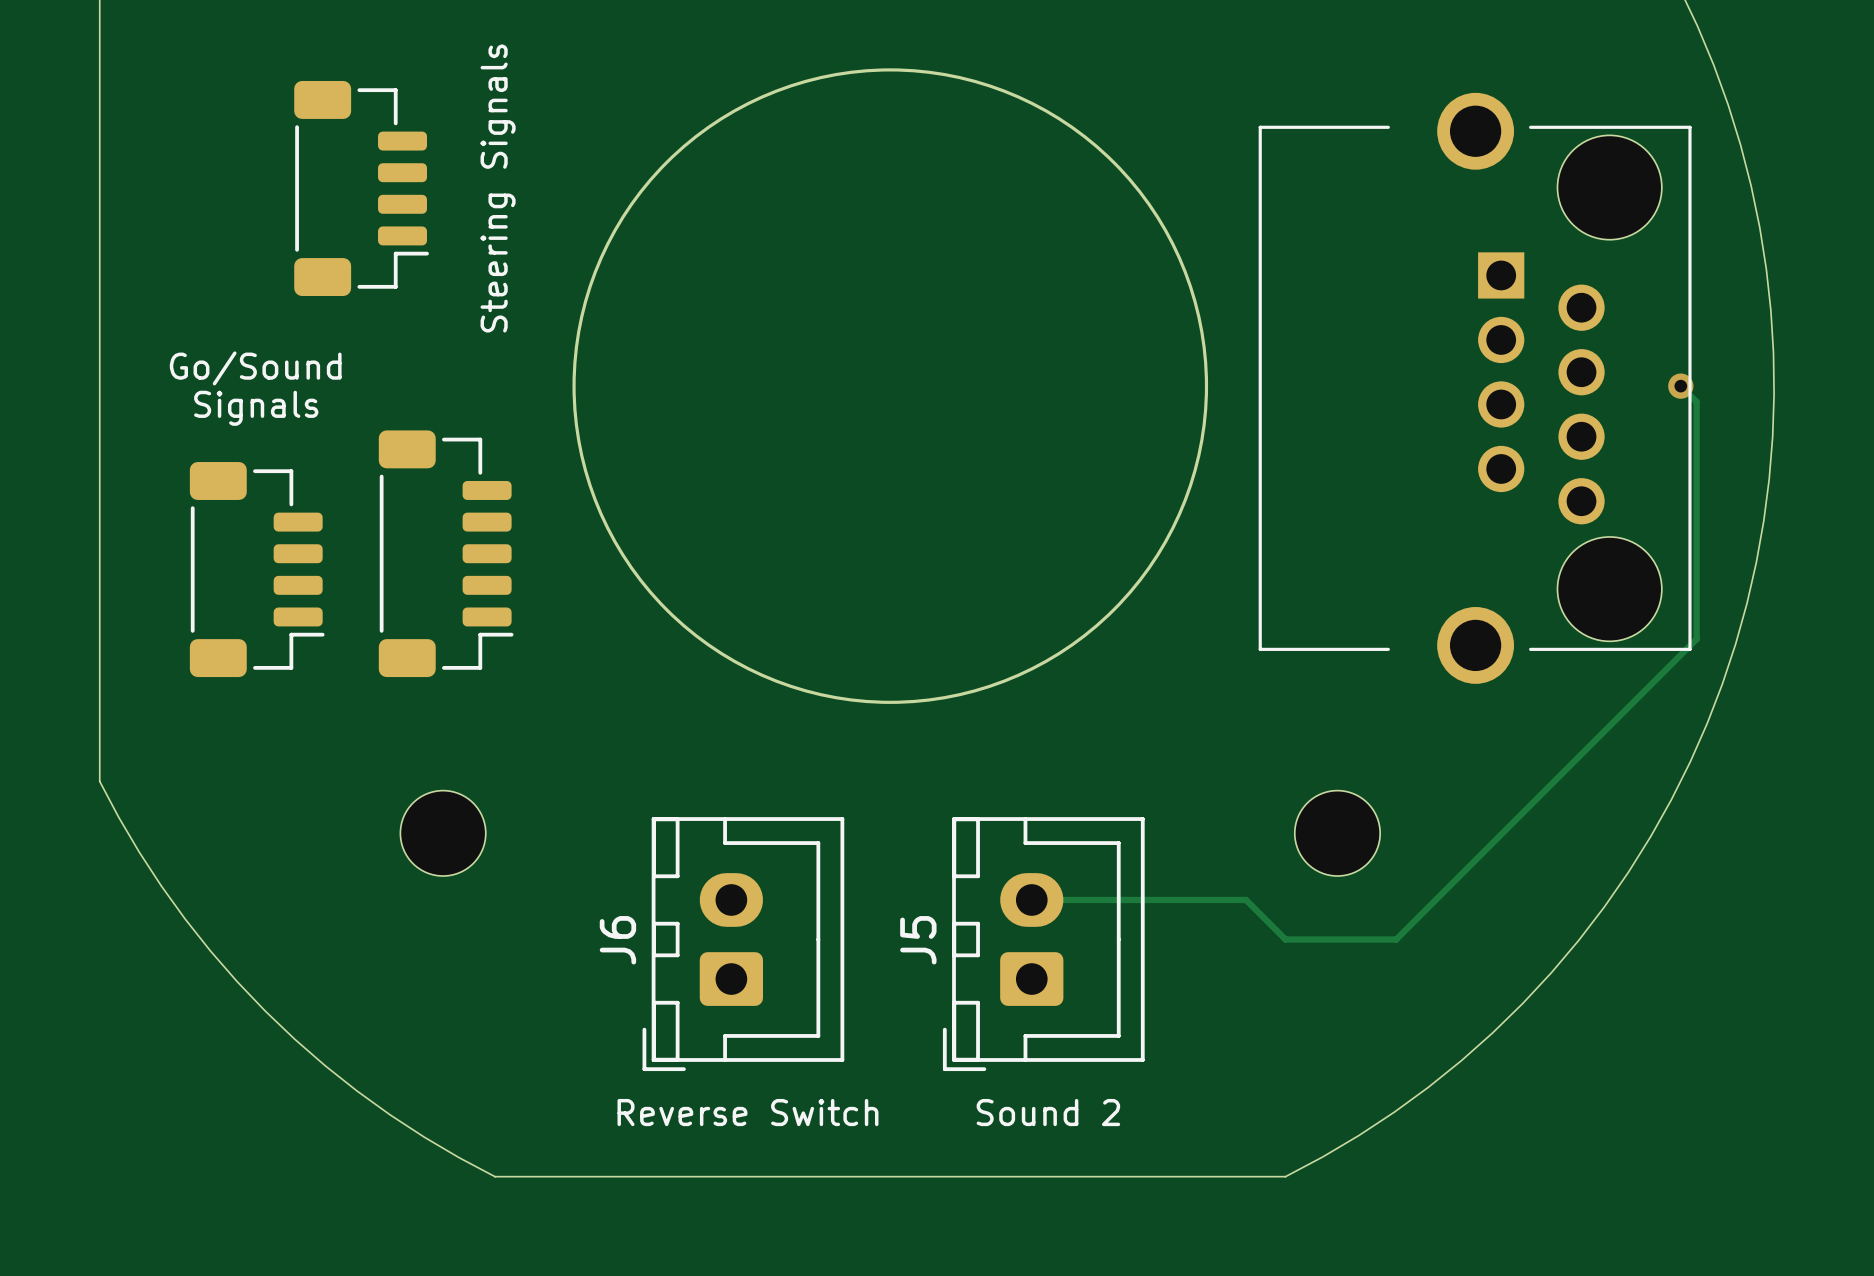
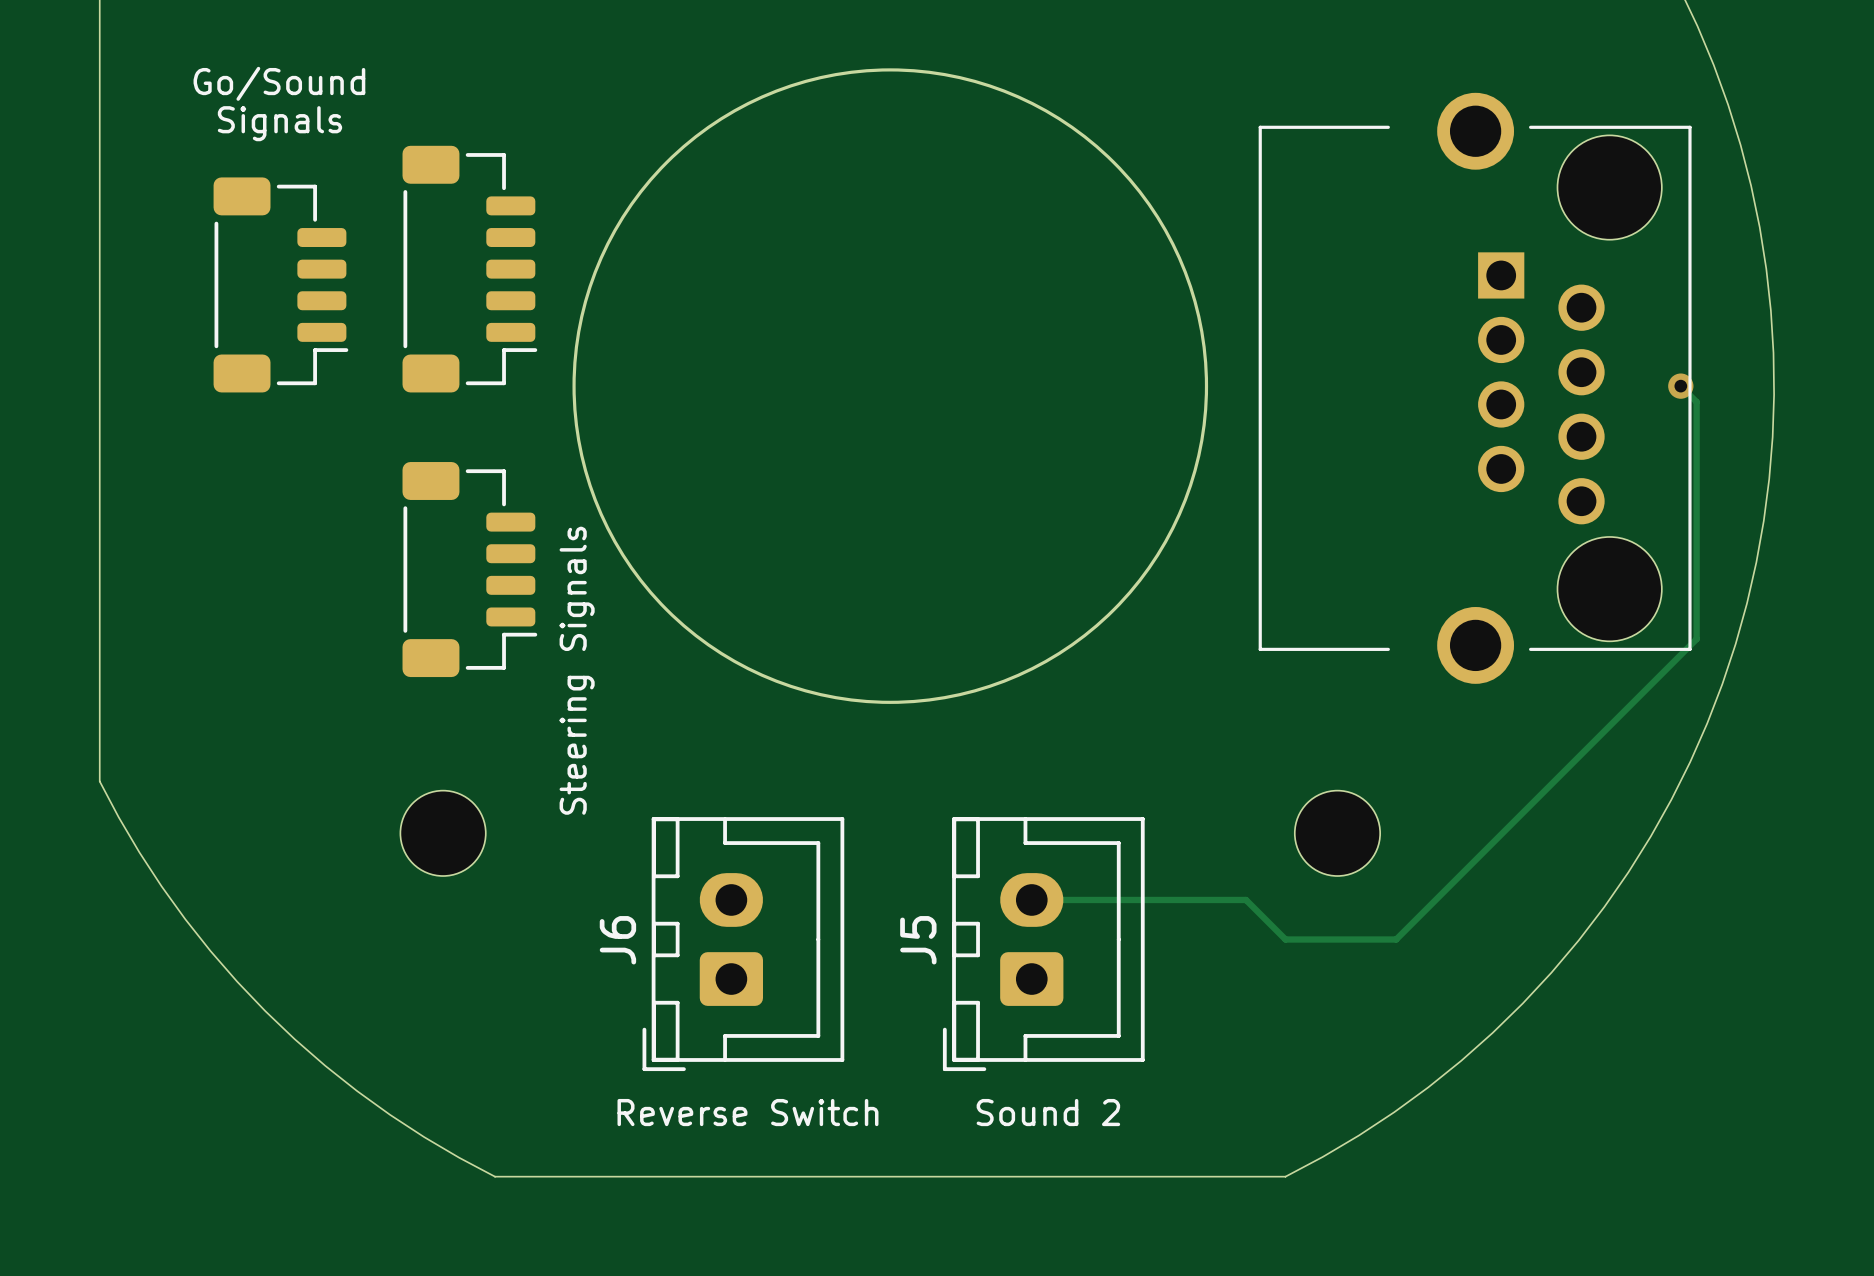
part position: (361, 188) -> (280, 284)
text position: Steering Signals (498, 188) -> Steering Signals (577, 670)
part: none -> (469, 269)
text position: Go/Sound (255, 368) -> Go/Sound (279, 83)
text position: Signals (256, 408) -> Signals (279, 123)
part footprint: [378, 430, 514, 678] -> [402, 462, 538, 678]
part: (257, 569) -> none

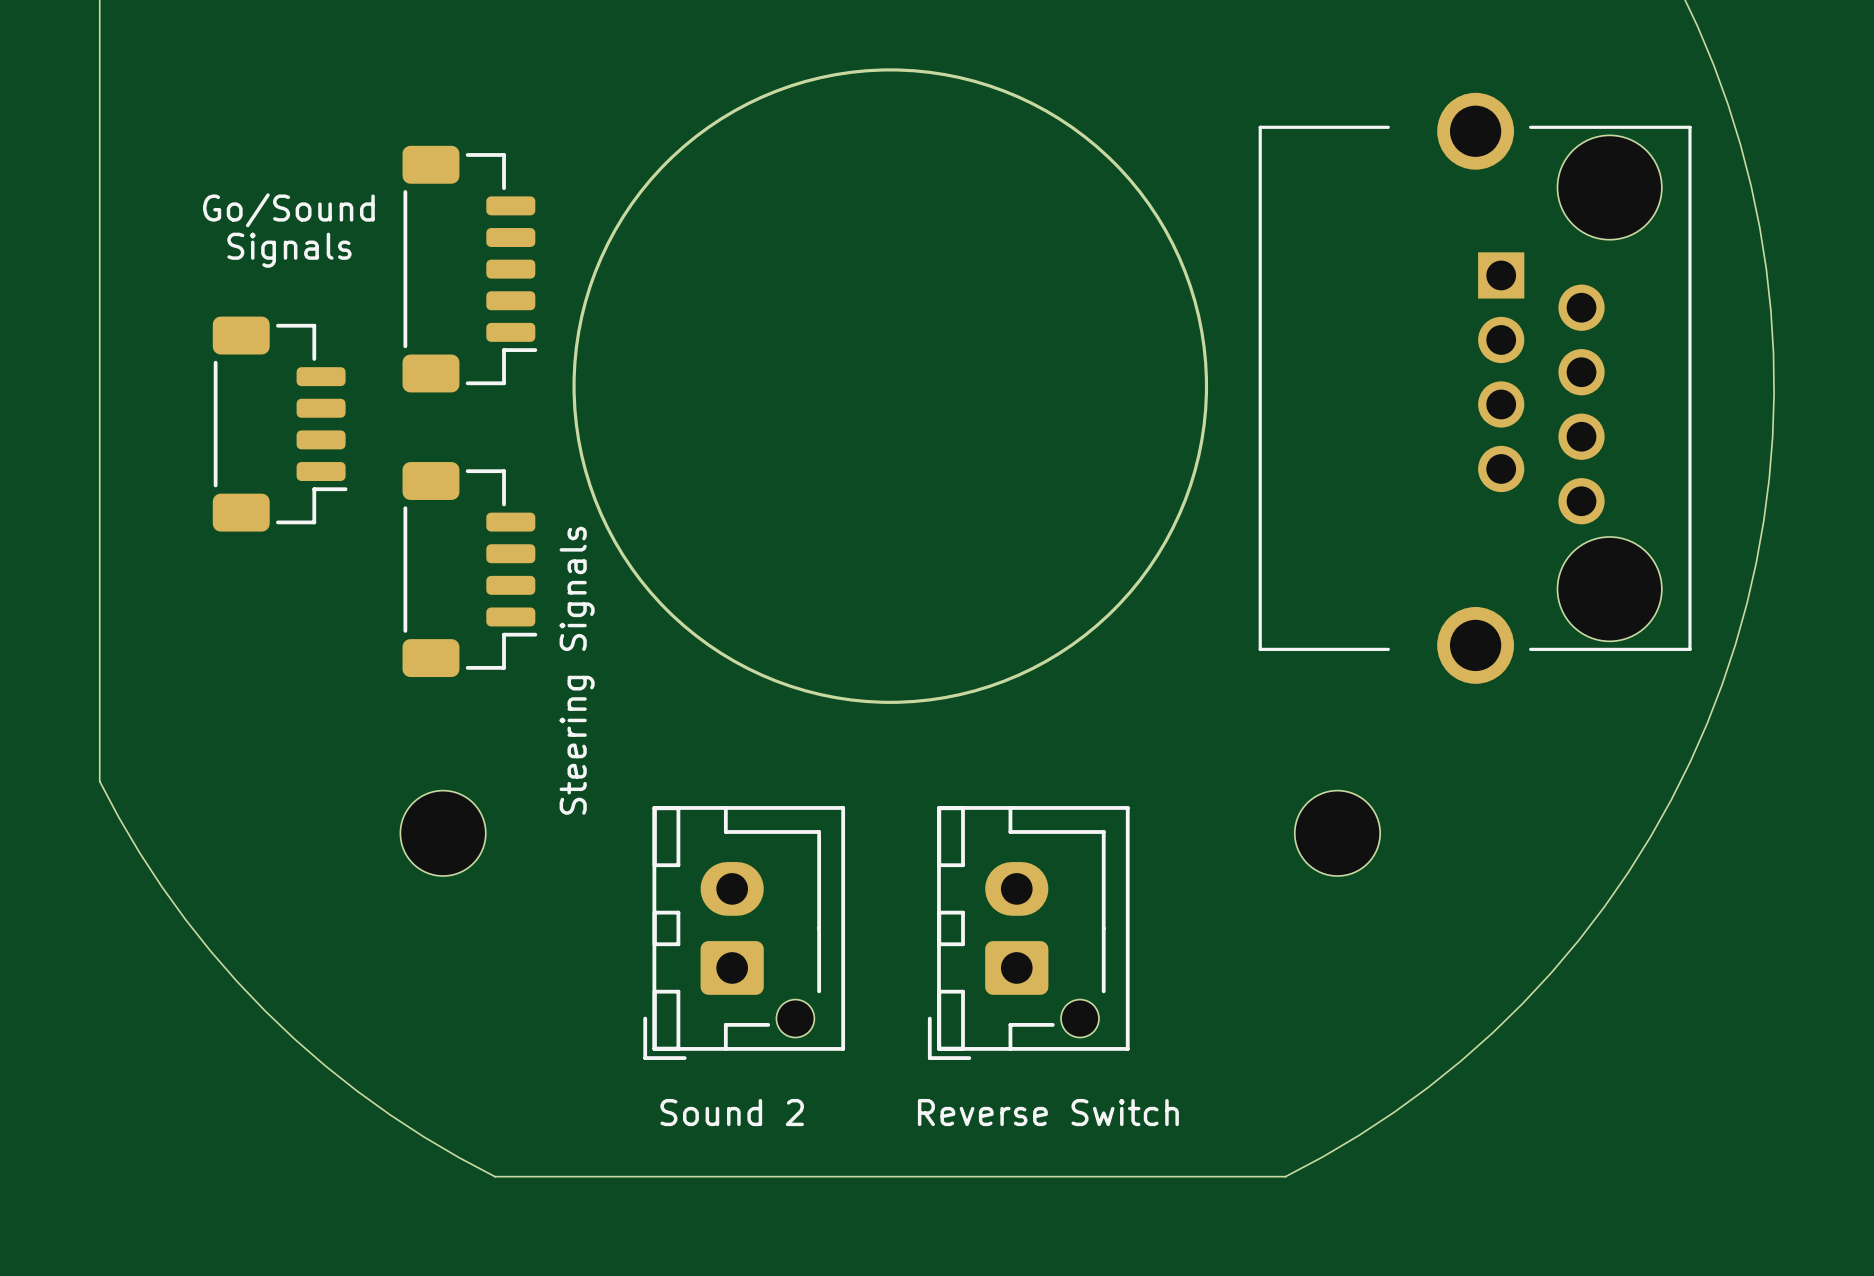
text position: Go/Sound (279, 83) -> Go/Sound (288, 210)
text position: Signals (279, 123) -> Signals (289, 250)
part position: (280, 284) -> (280, 424)
track: (1680, 386) (1696, 401) (1696, 639) (1396, 939) (1285, 939) (1246, 899) (1031, 899) -> none
via: (1680, 386) -> none
part: none -> (744, 933)
part: none -> (1028, 933)
J6: (743, 944) -> none
J5: (1043, 944) -> none
text: Reverse Switch (747, 1112) -> Sound 2 (732, 1112)
text: Sound 2 (1048, 1112) -> Reverse Switch (1048, 1112)

